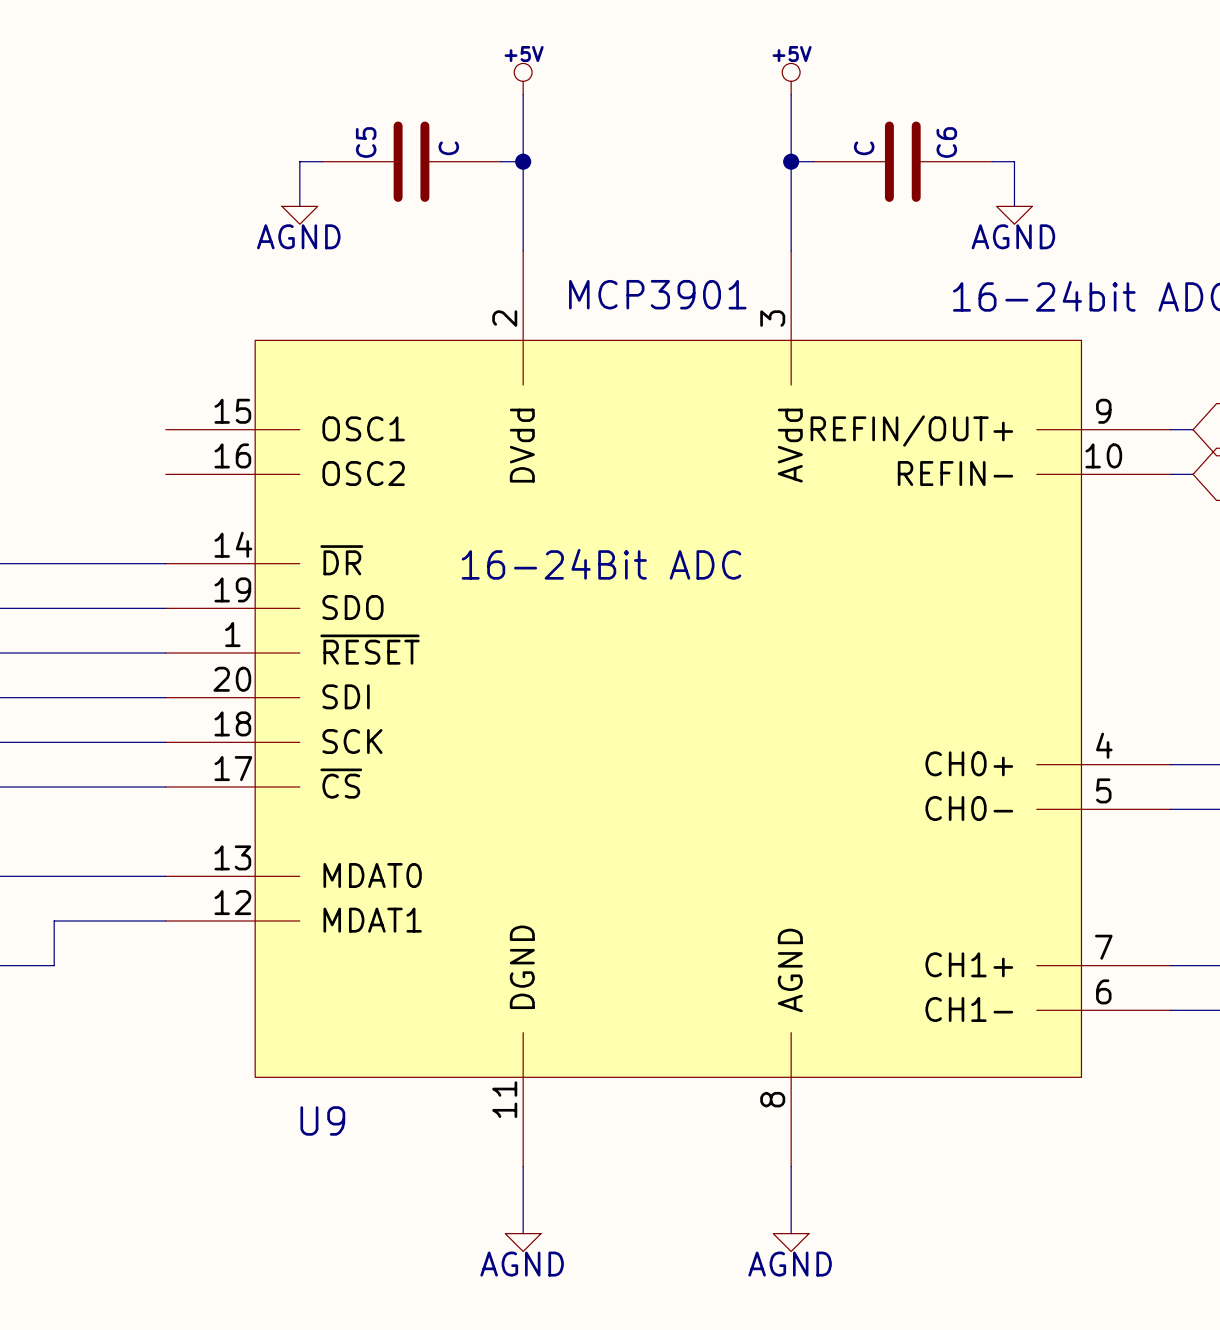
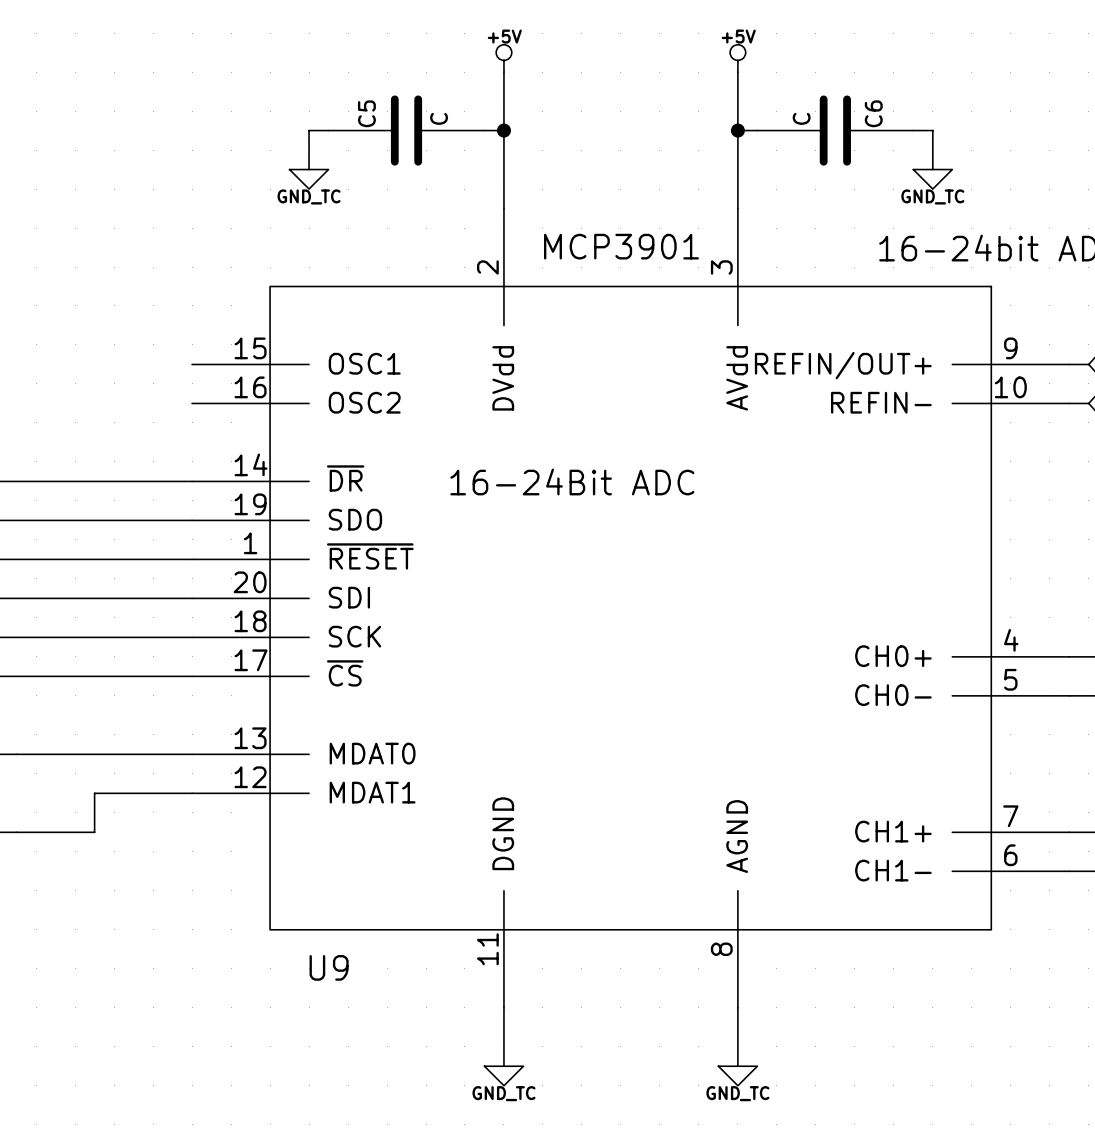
power symbol: AGND (299, 215) -> GND_TC (309, 179)
power symbol: AGND (1014, 215) -> GND_TC (932, 179)
power symbol: AGND (523, 1242) -> GND_TC (503, 1075)
power symbol: AGND (791, 1242) -> GND_TC (737, 1075)

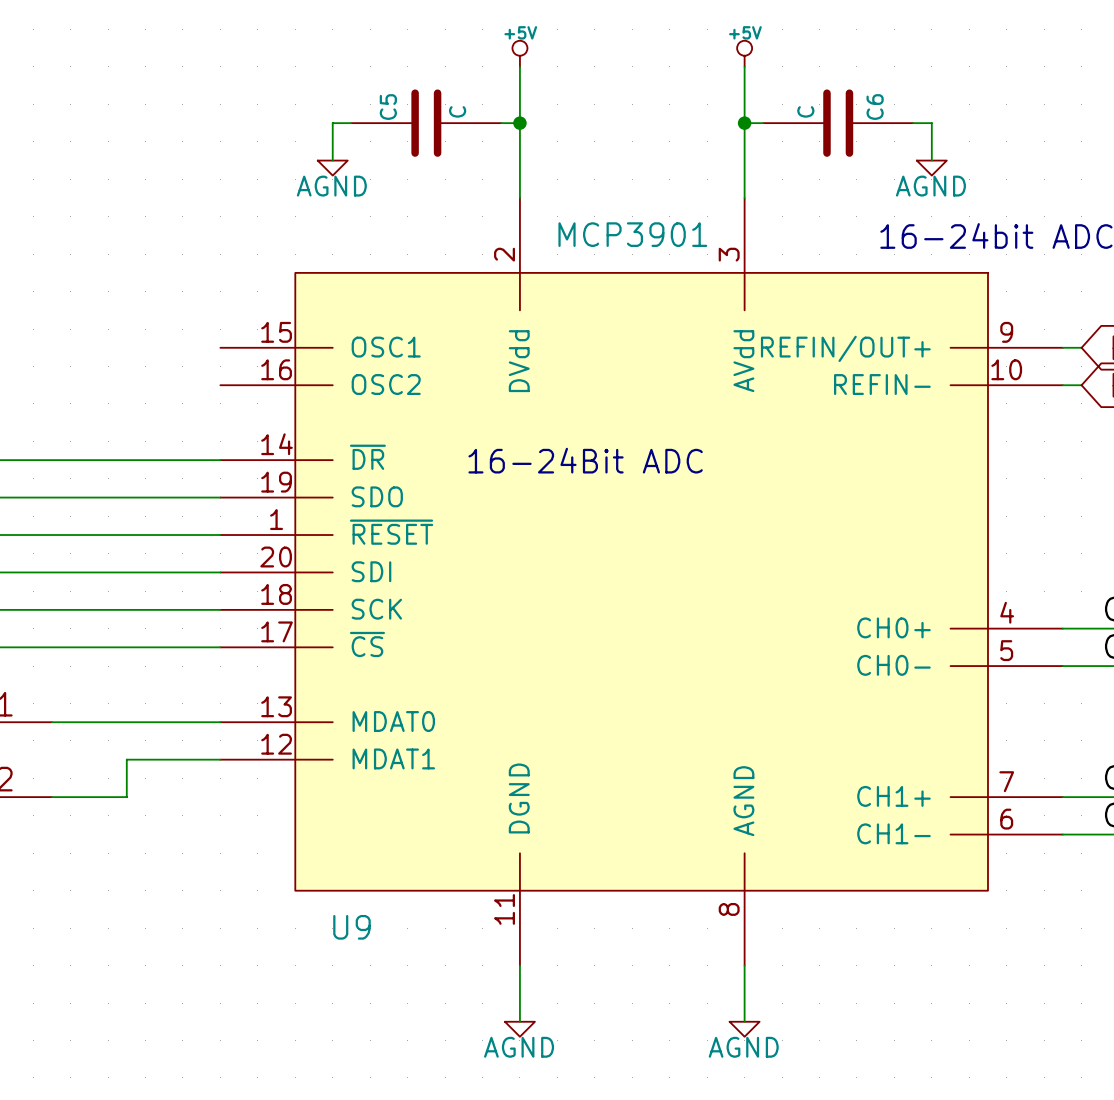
power symbol: GND_TC (309, 179) -> AGND (332, 168)
power symbol: GND_TC (932, 179) -> AGND (931, 168)
power symbol: GND_TC (503, 1075) -> AGND (519, 1029)
power symbol: GND_TC (737, 1075) -> AGND (744, 1029)

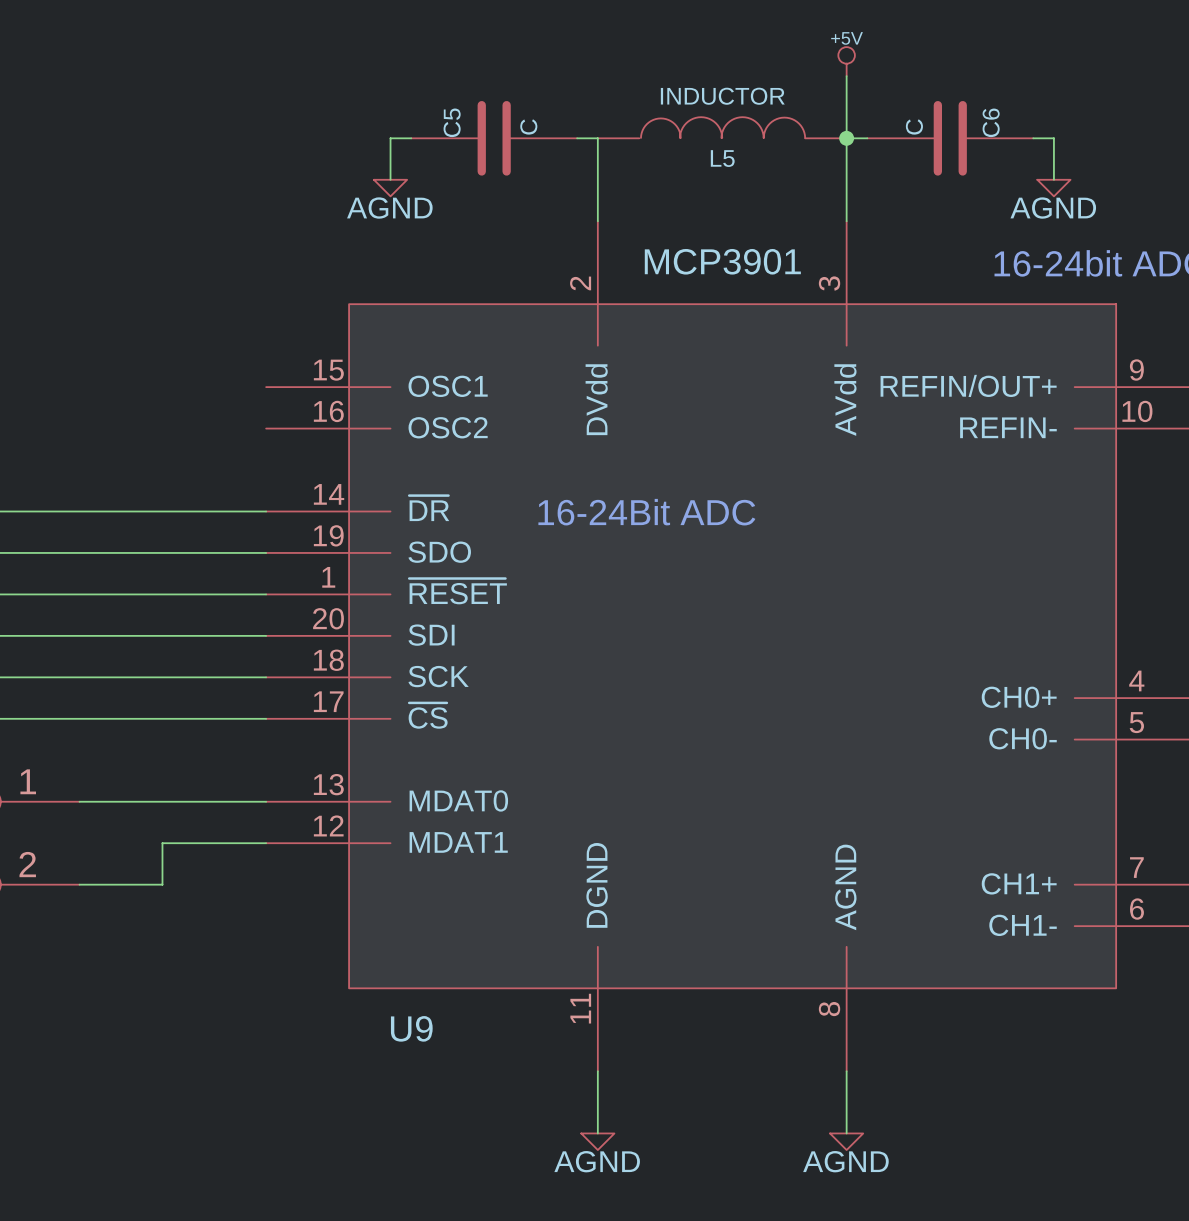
power symbol: +5V (519, 53) -> none
wire: (519, 66) (519, 123) -> none
L5: none -> INDUCTOR (722, 127)
junction: (519, 123) -> none

